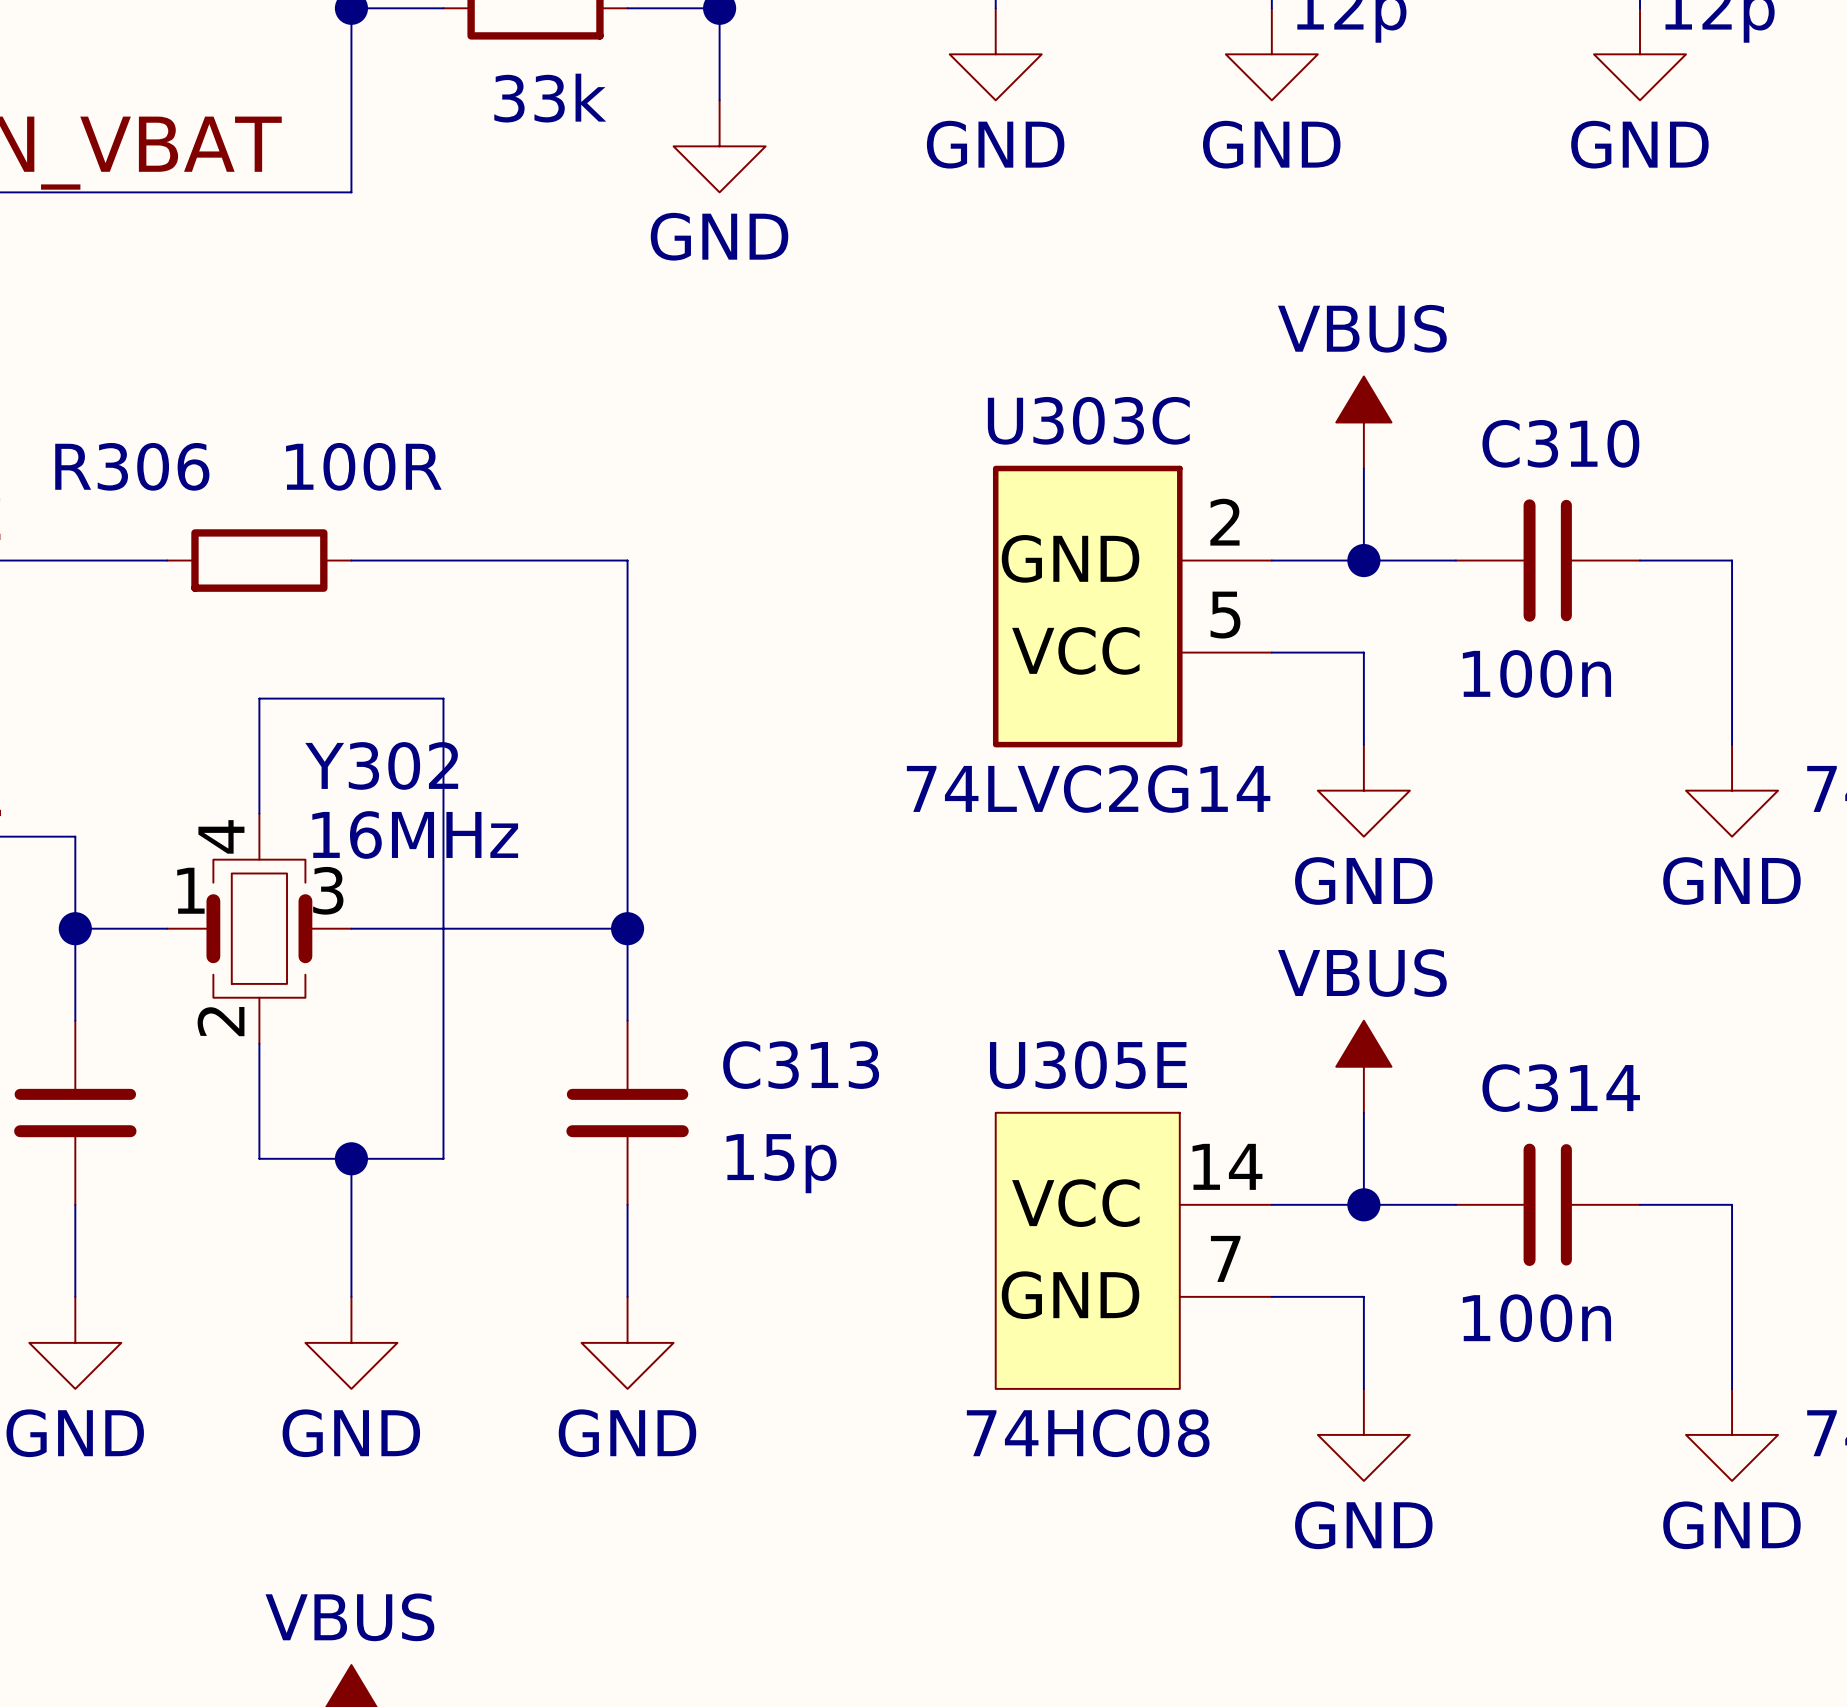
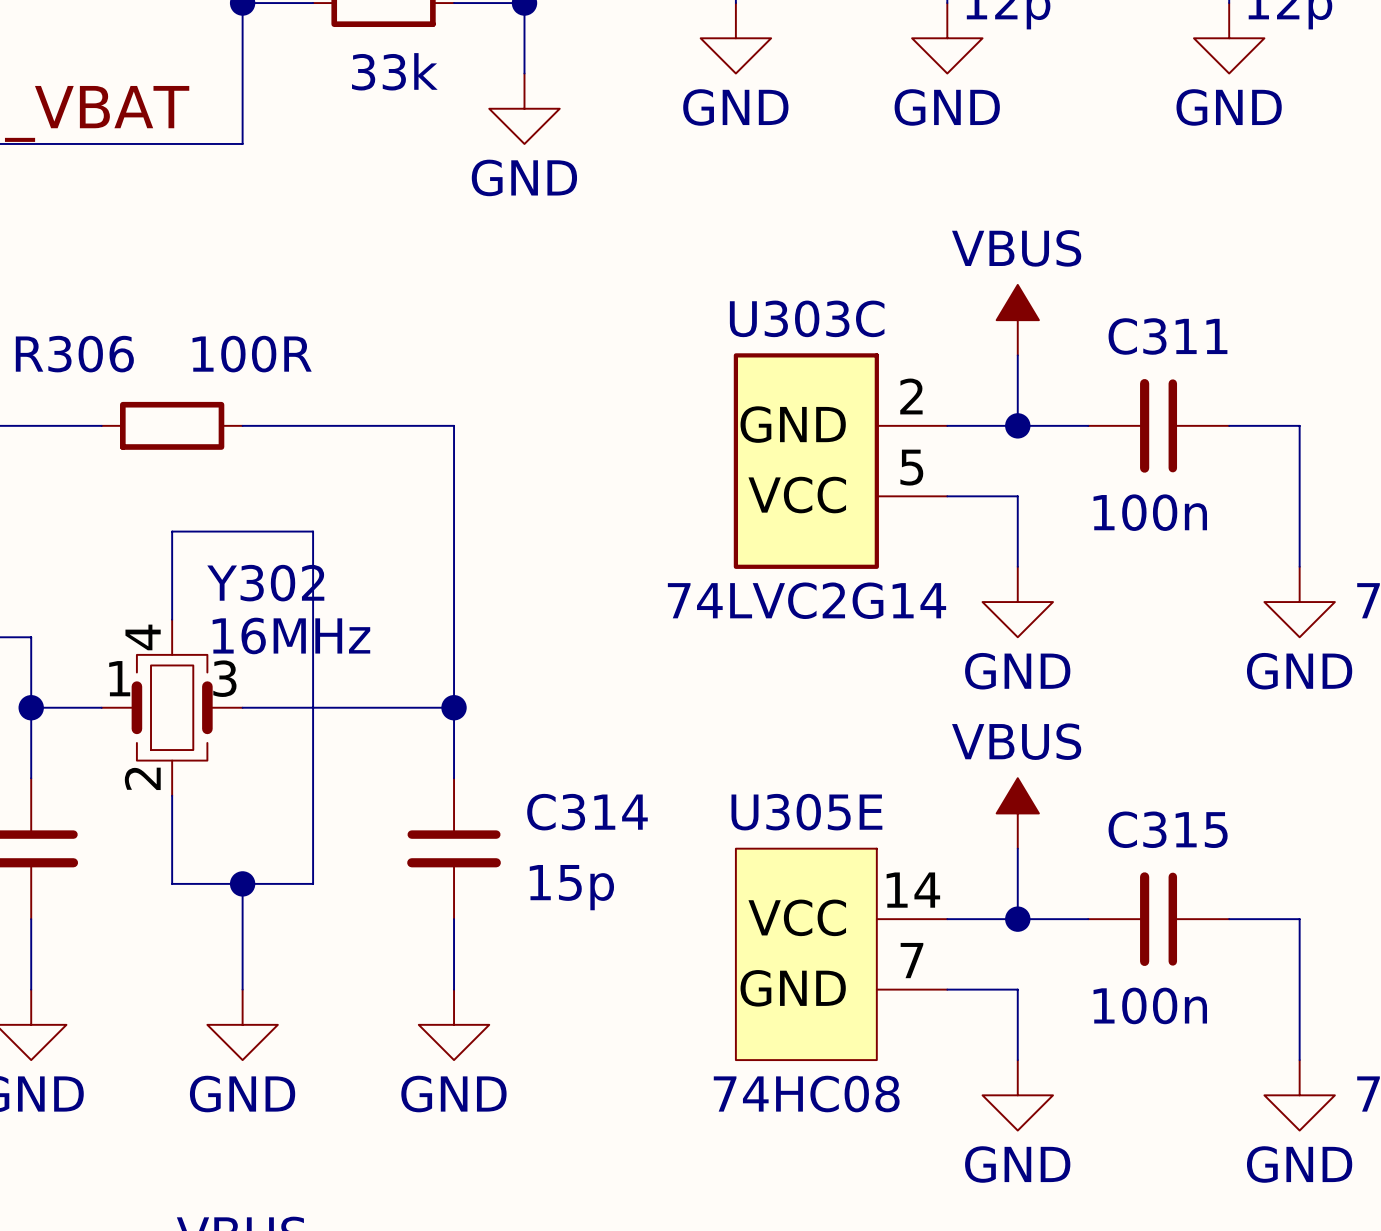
C310 name: C310 (1560, 443) -> C311 (1167, 336)
C313 name: C313 (801, 1065) -> C314 (587, 812)
C314 name: C314 (1561, 1088) -> C315 (1168, 829)

